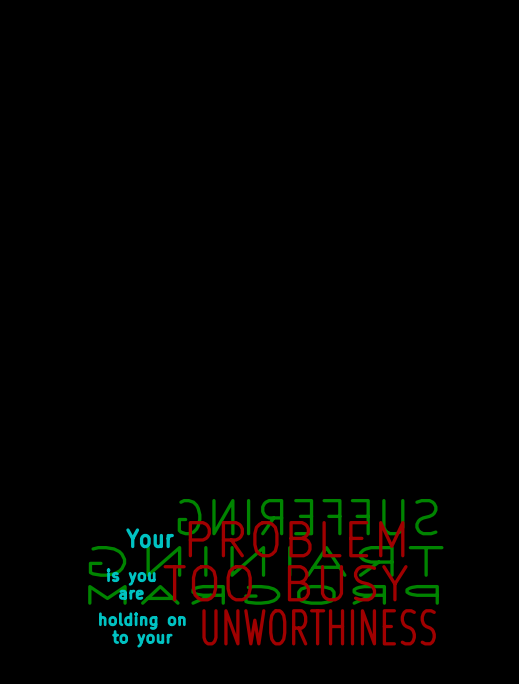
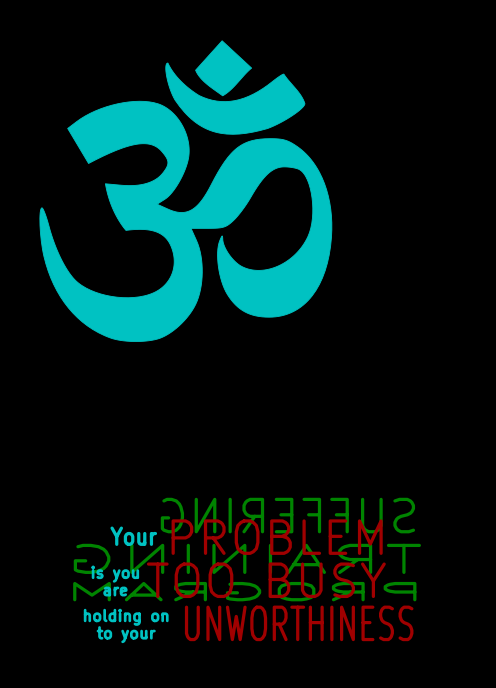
drawing: none -> [39, 40, 333, 342]

